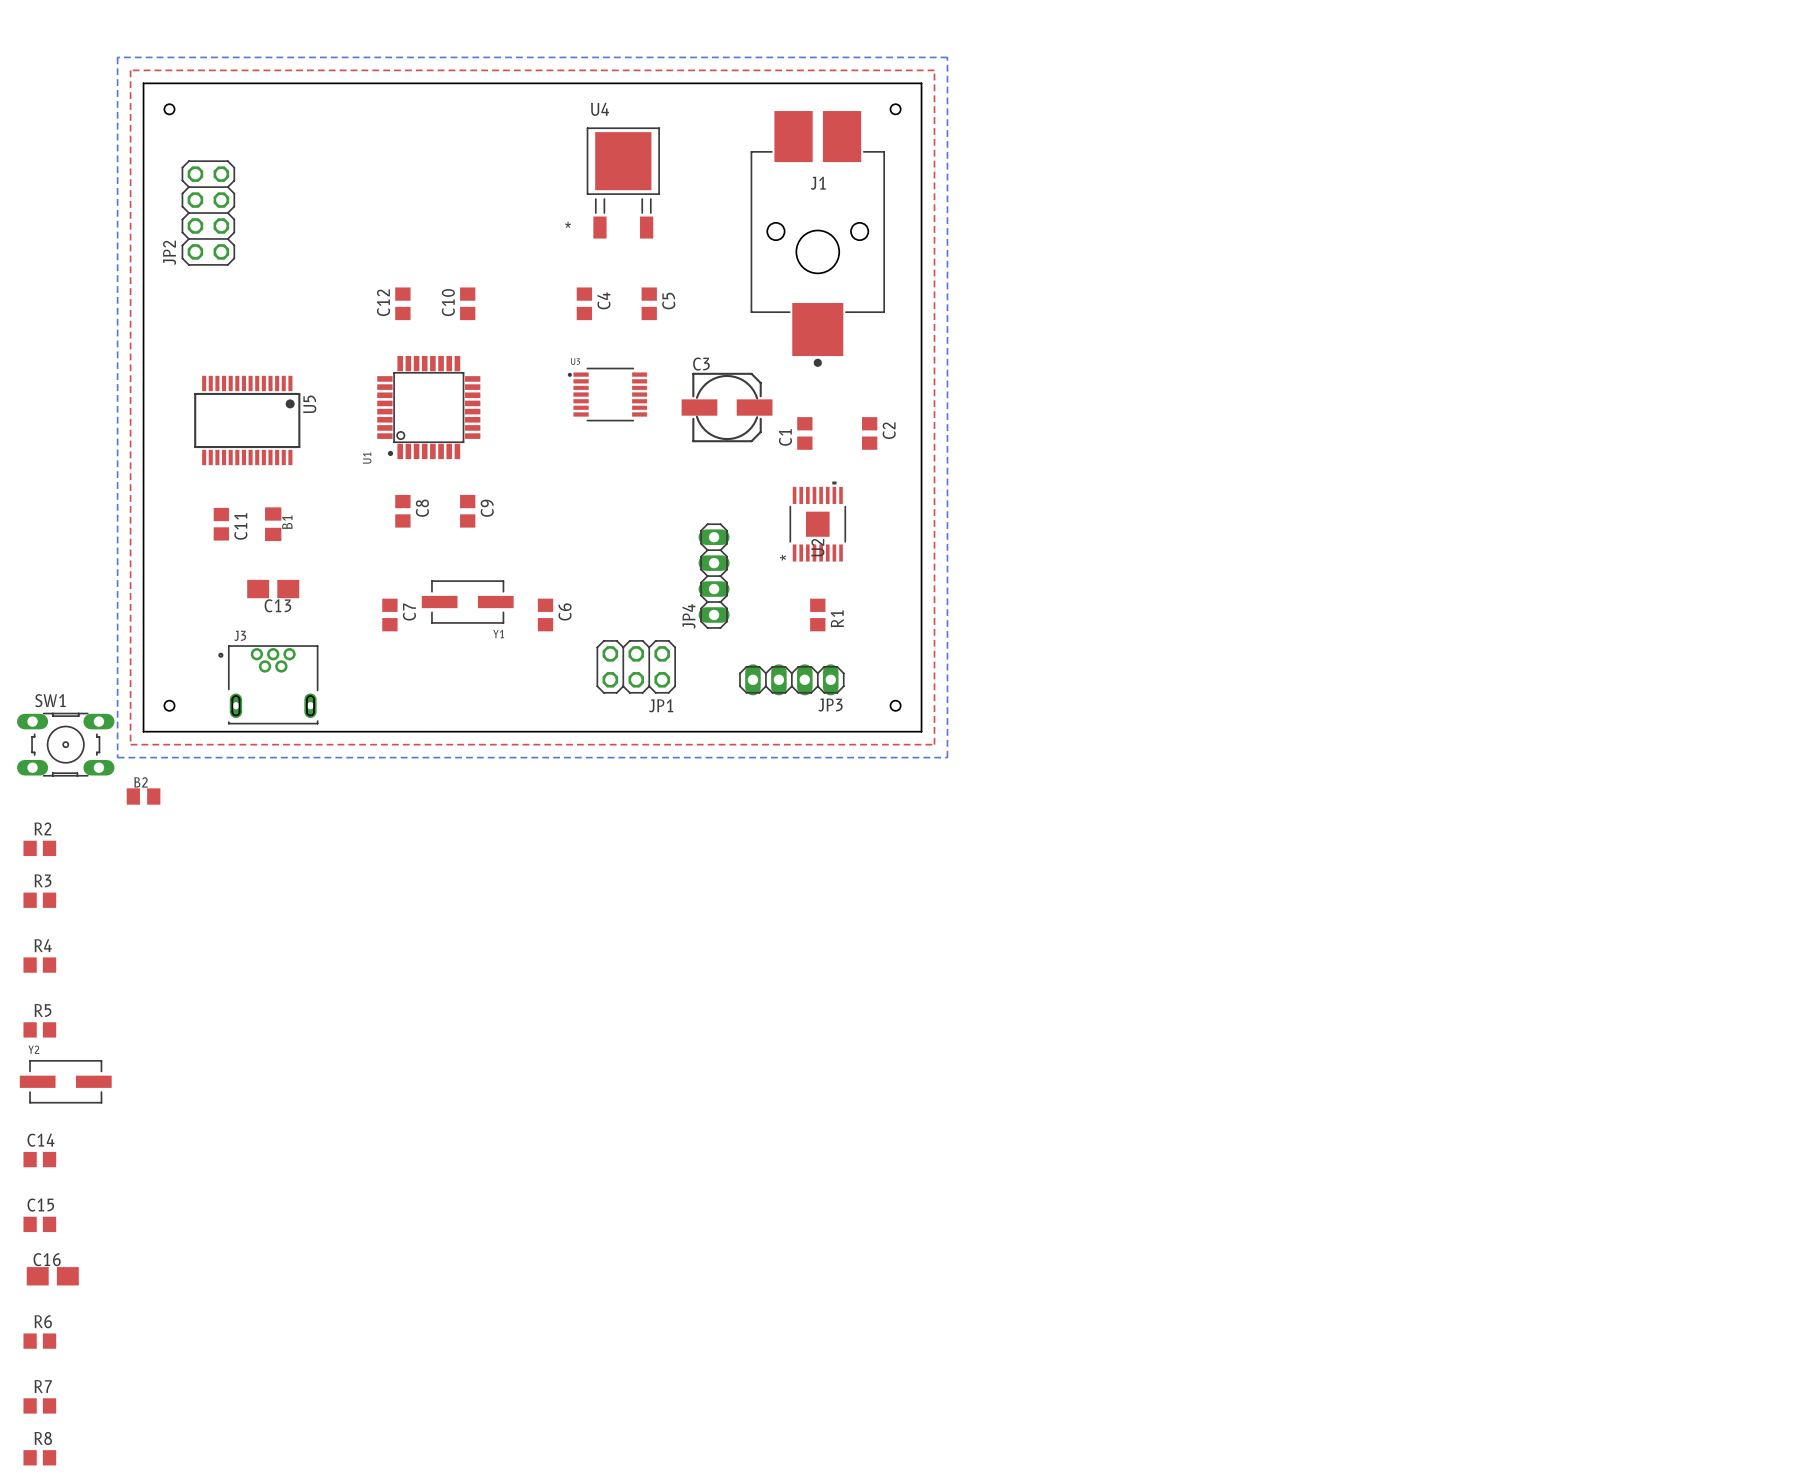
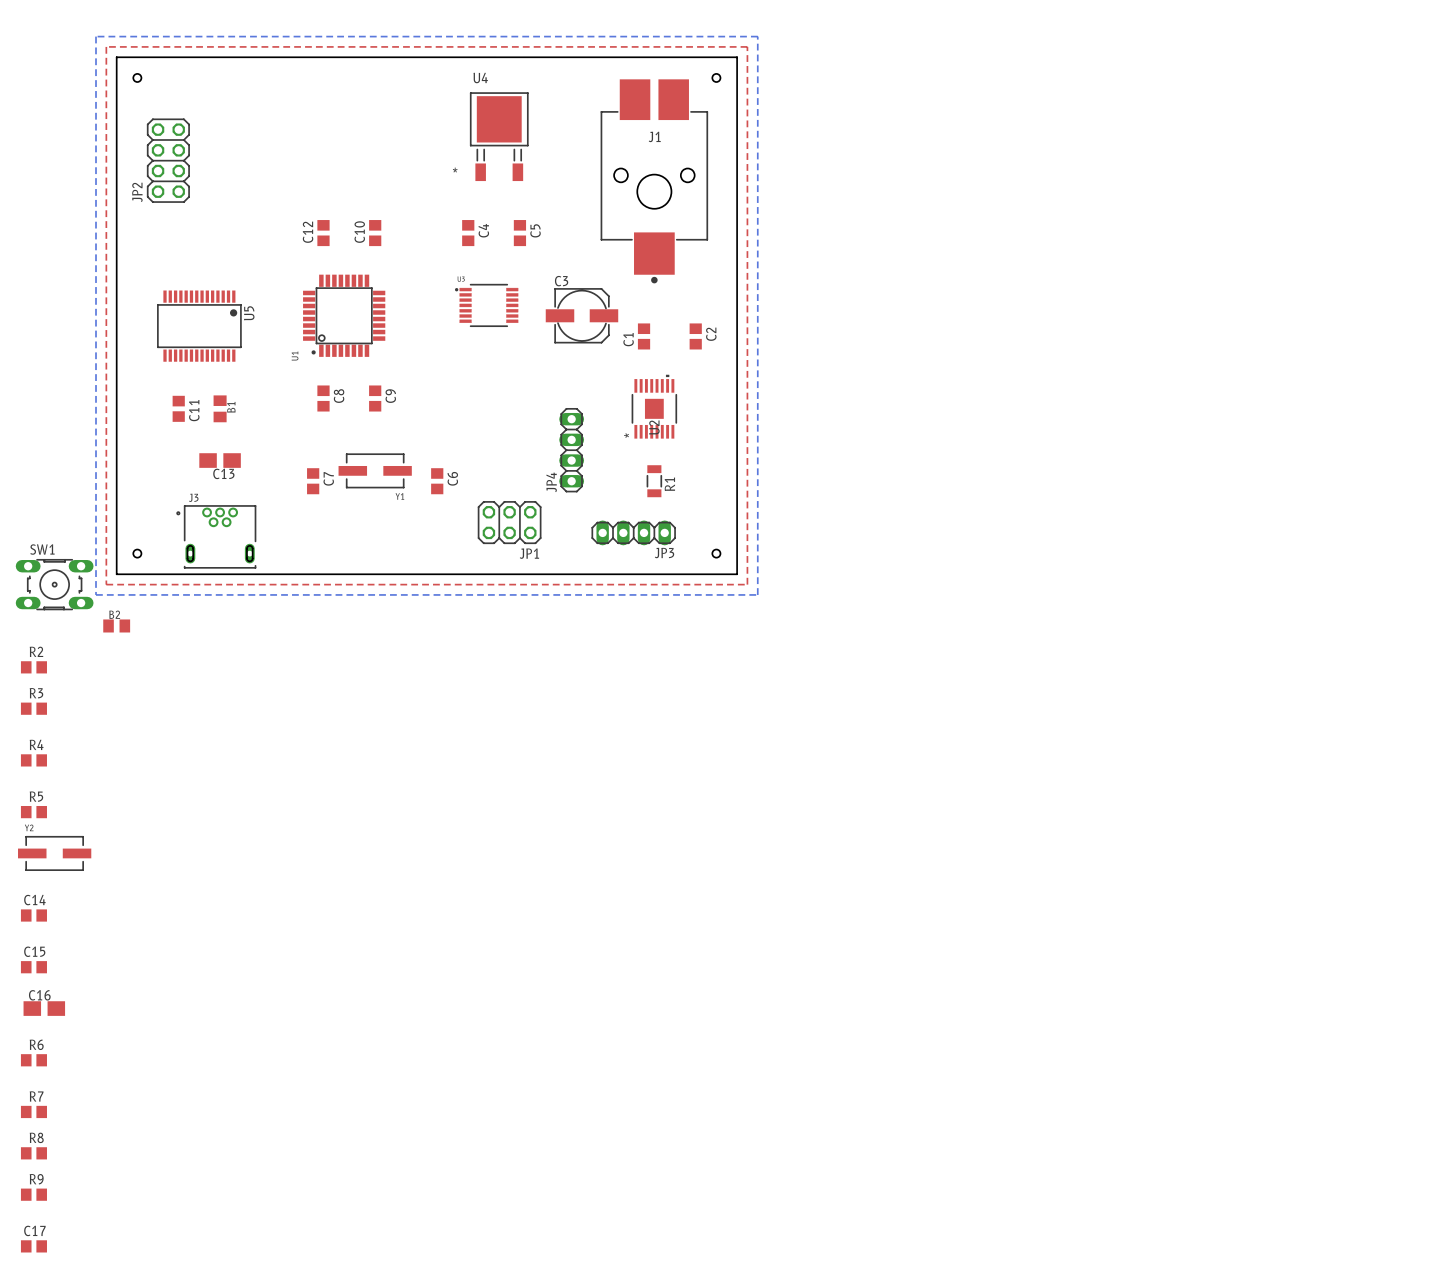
R1 footprint: [810, 598, 826, 632] -> [646, 465, 662, 498]

